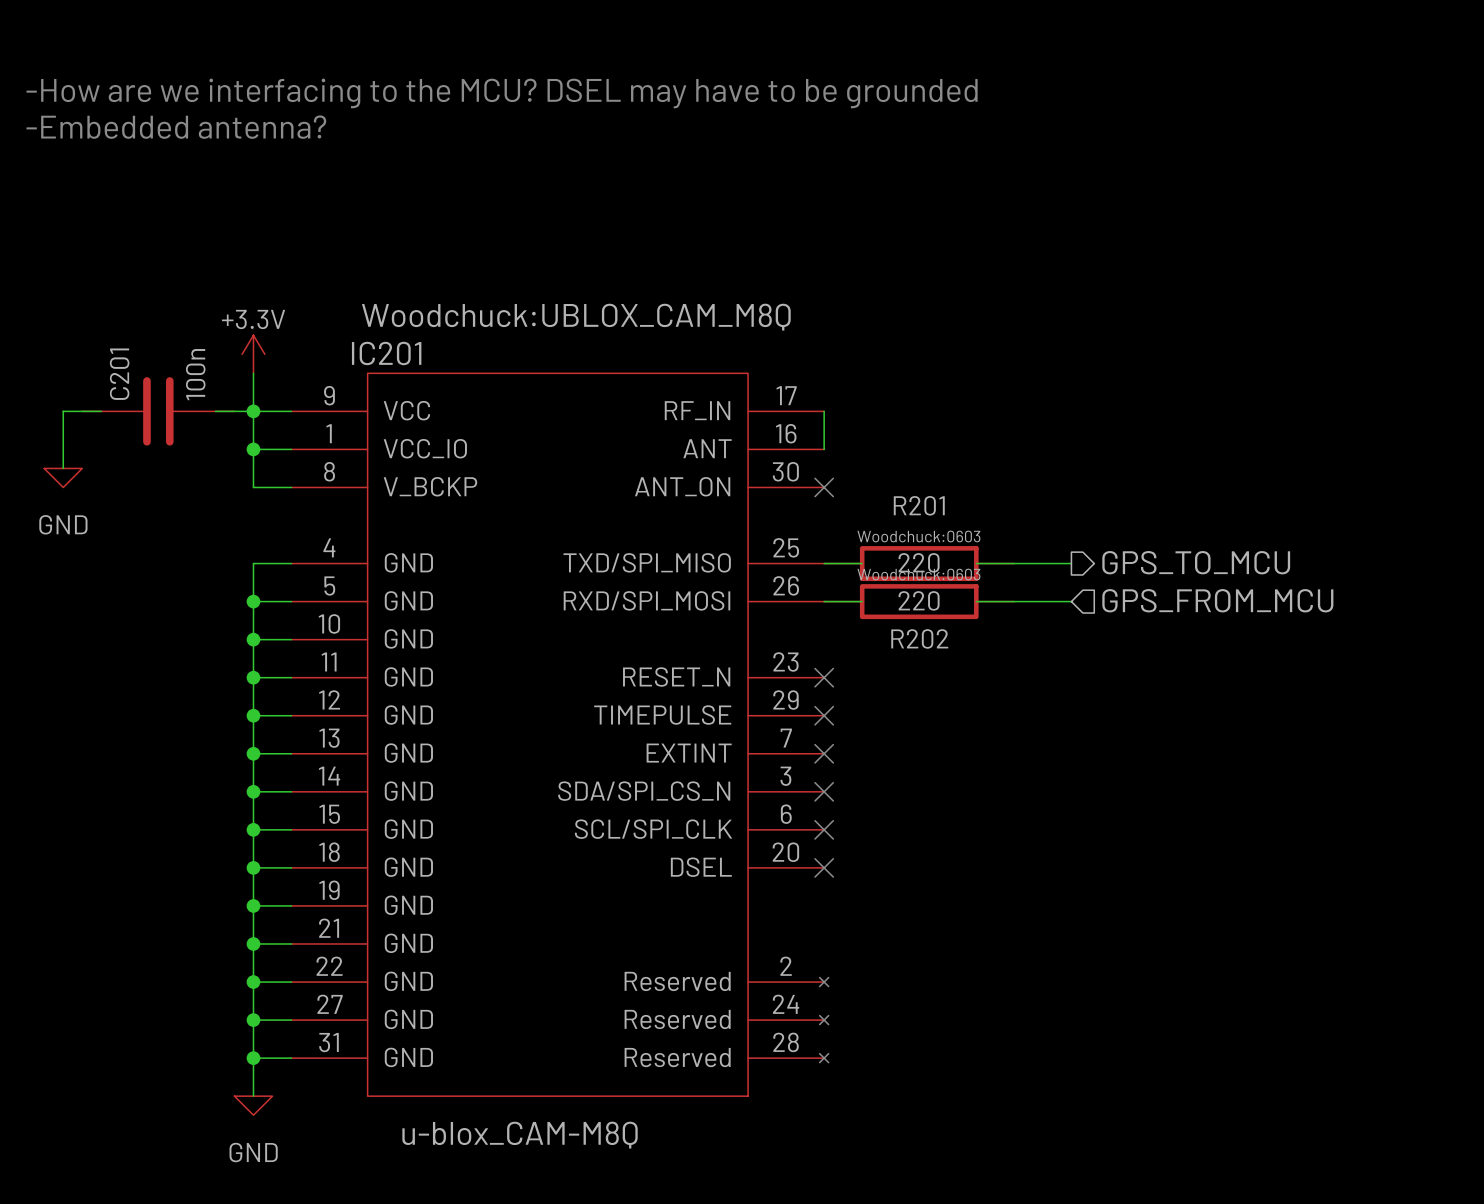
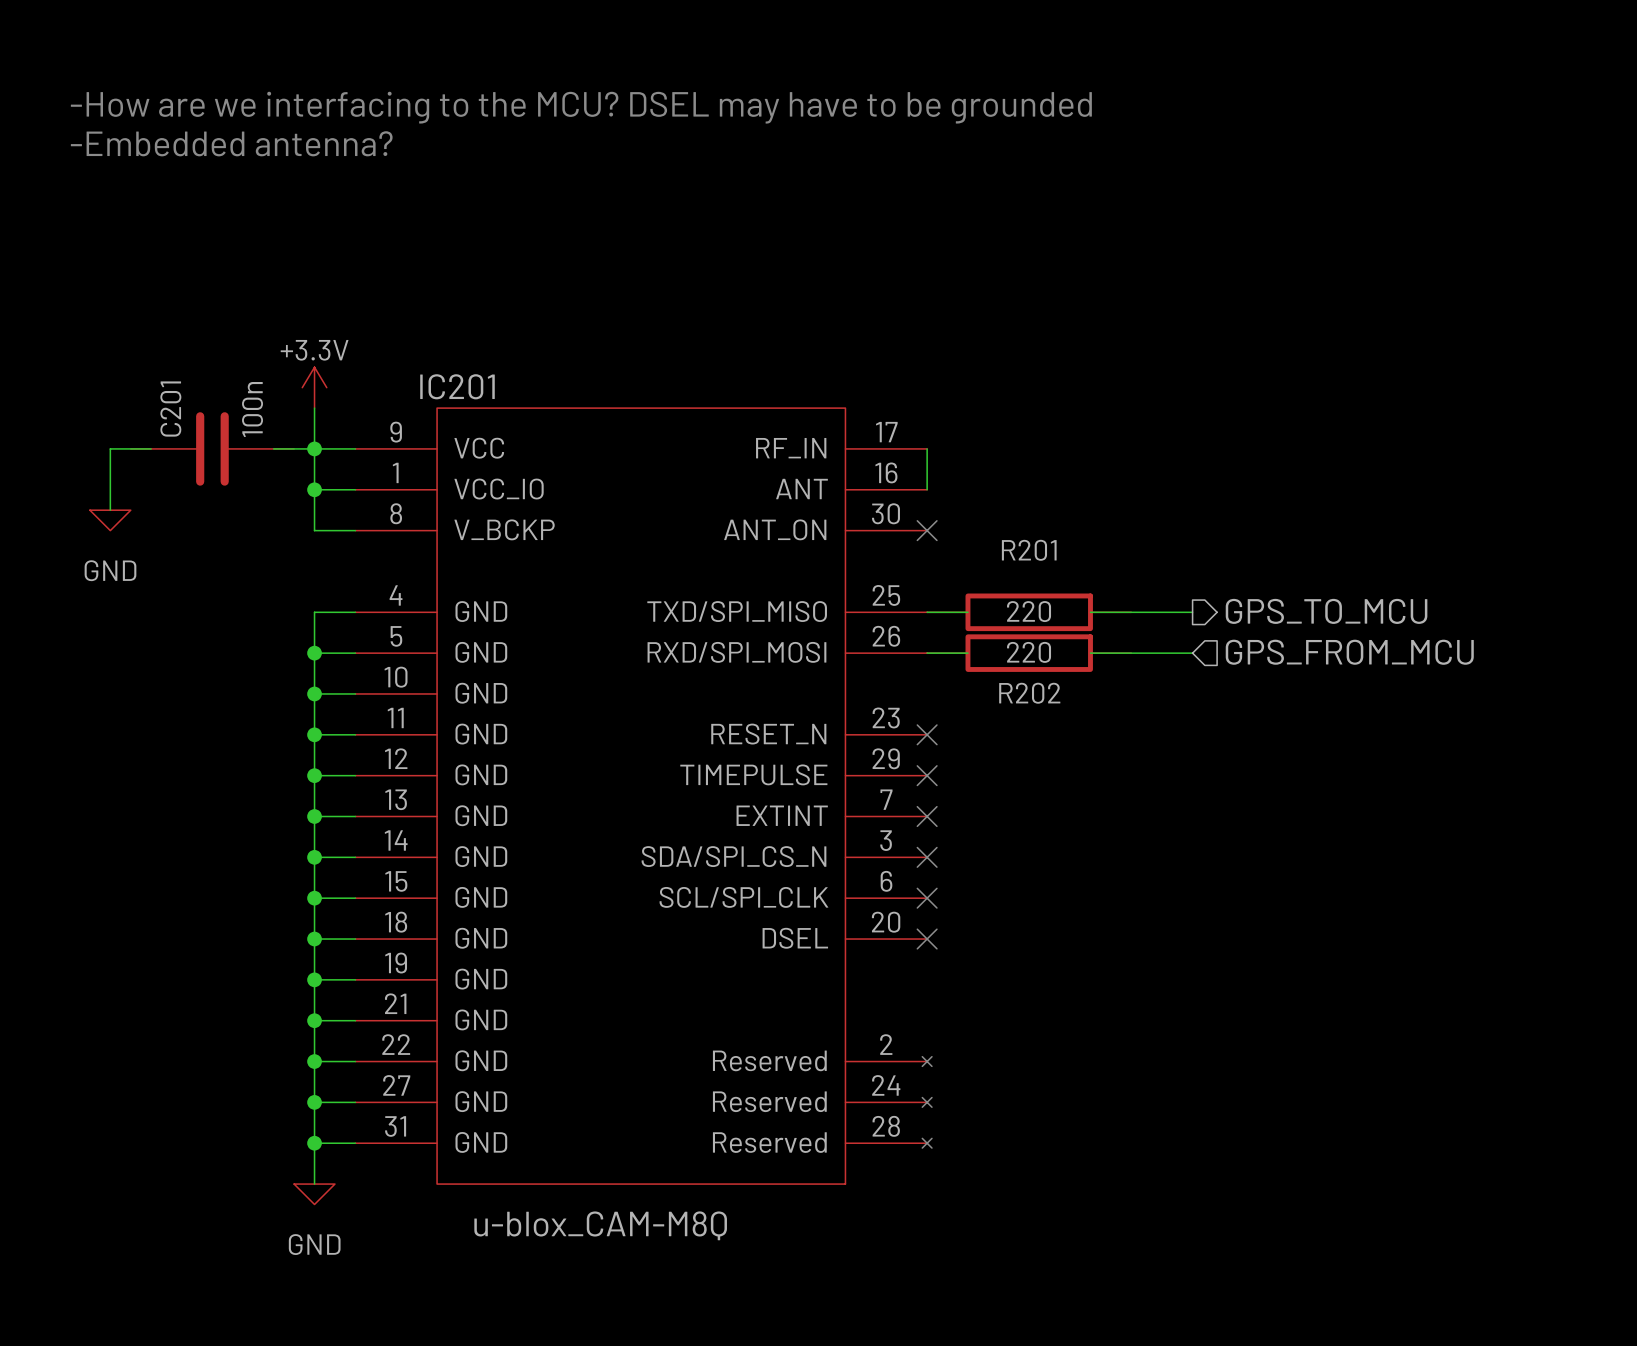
IC201 text: Woodchuck:UBLOX_CAM_M8Q (576, 317) -> none
R201 text: Woodchuck:0603 (918, 536) -> none
R202 text: Woodchuck:0603 (918, 574) -> none

